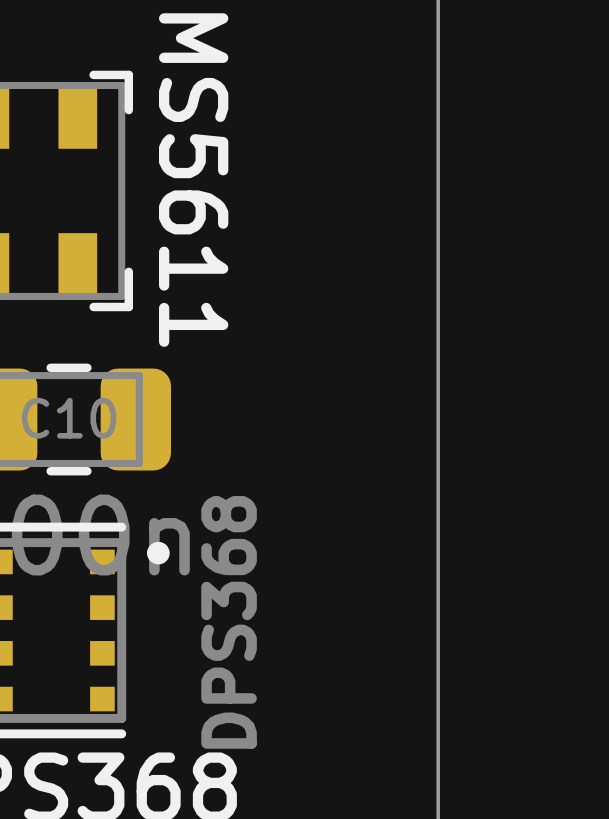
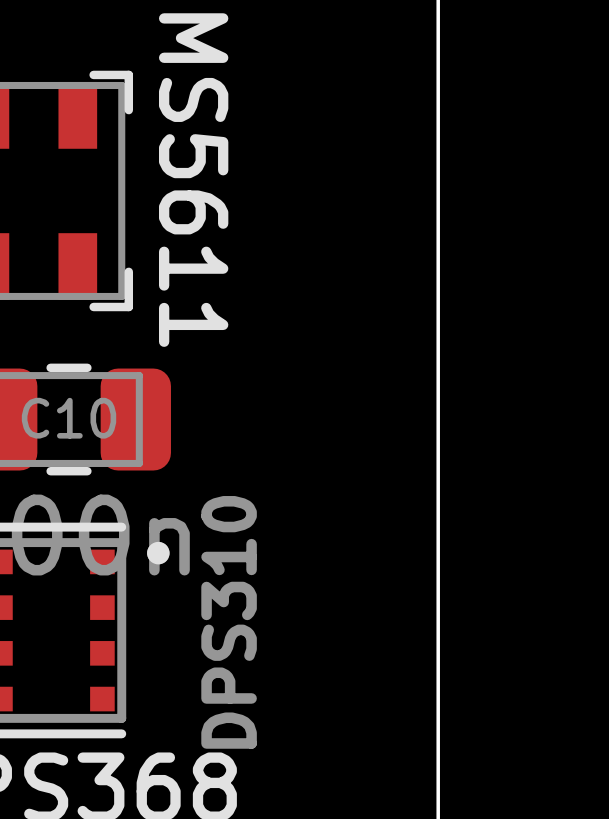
part value: DPS368 (229, 622) -> DPS310 (229, 622)

